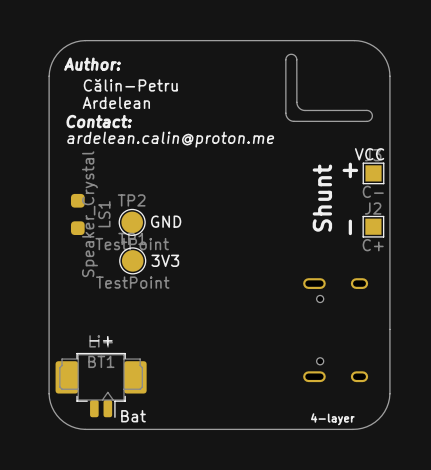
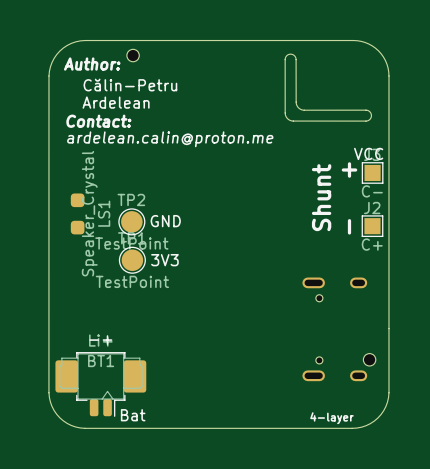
part: none -> (133, 55)
part: none -> (369, 359)

